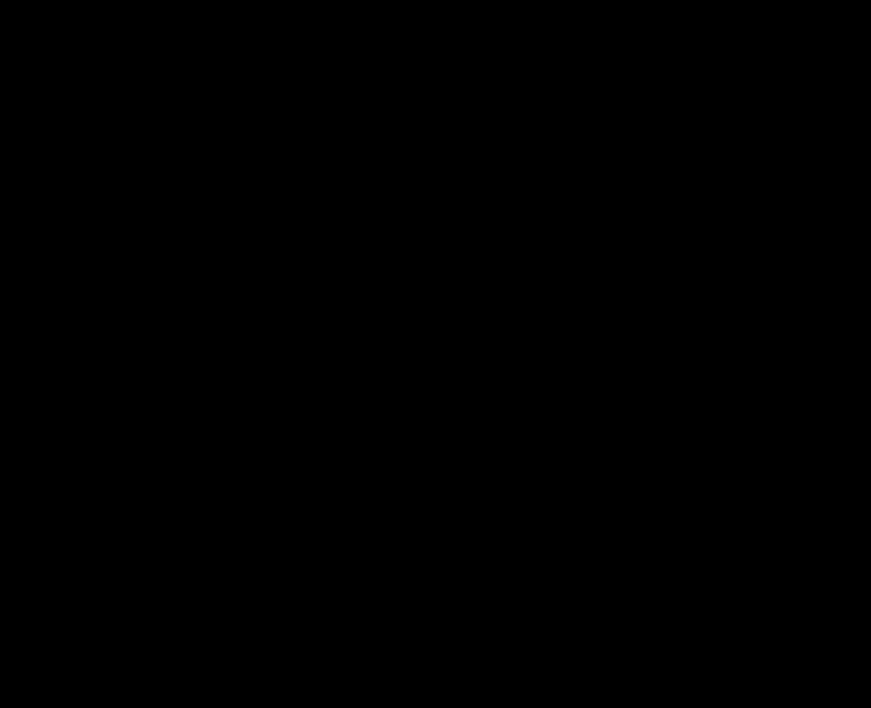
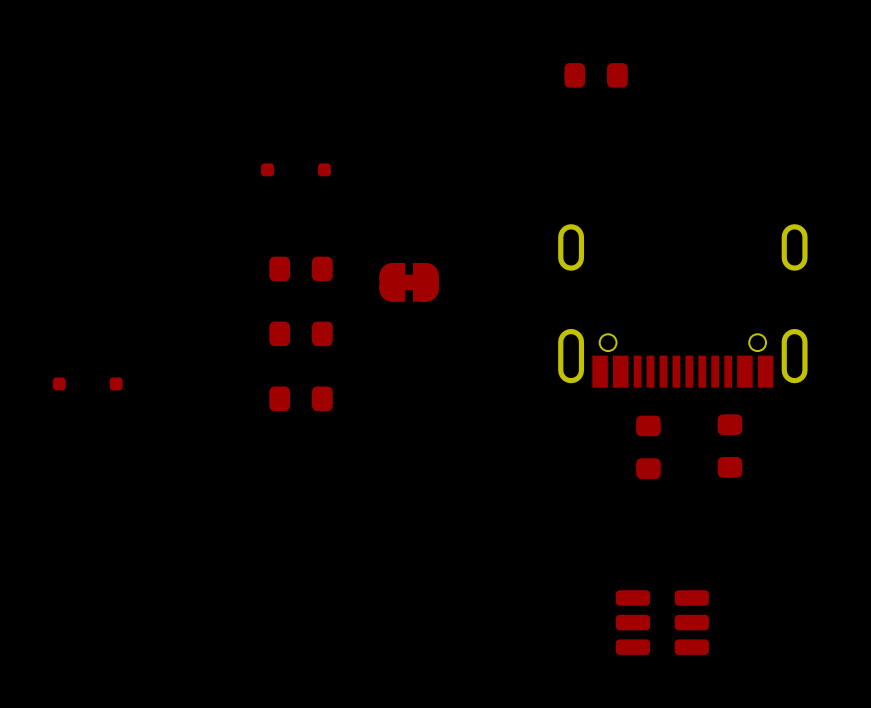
part: none -> (596, 75)
part: none -> (295, 169)
part: none -> (301, 268)
part: none -> (409, 282)
part: none -> (682, 305)
part: none -> (301, 333)
part: none -> (87, 383)
part: none -> (301, 398)
part: none -> (729, 446)
part: none -> (648, 447)
part: none -> (662, 622)

